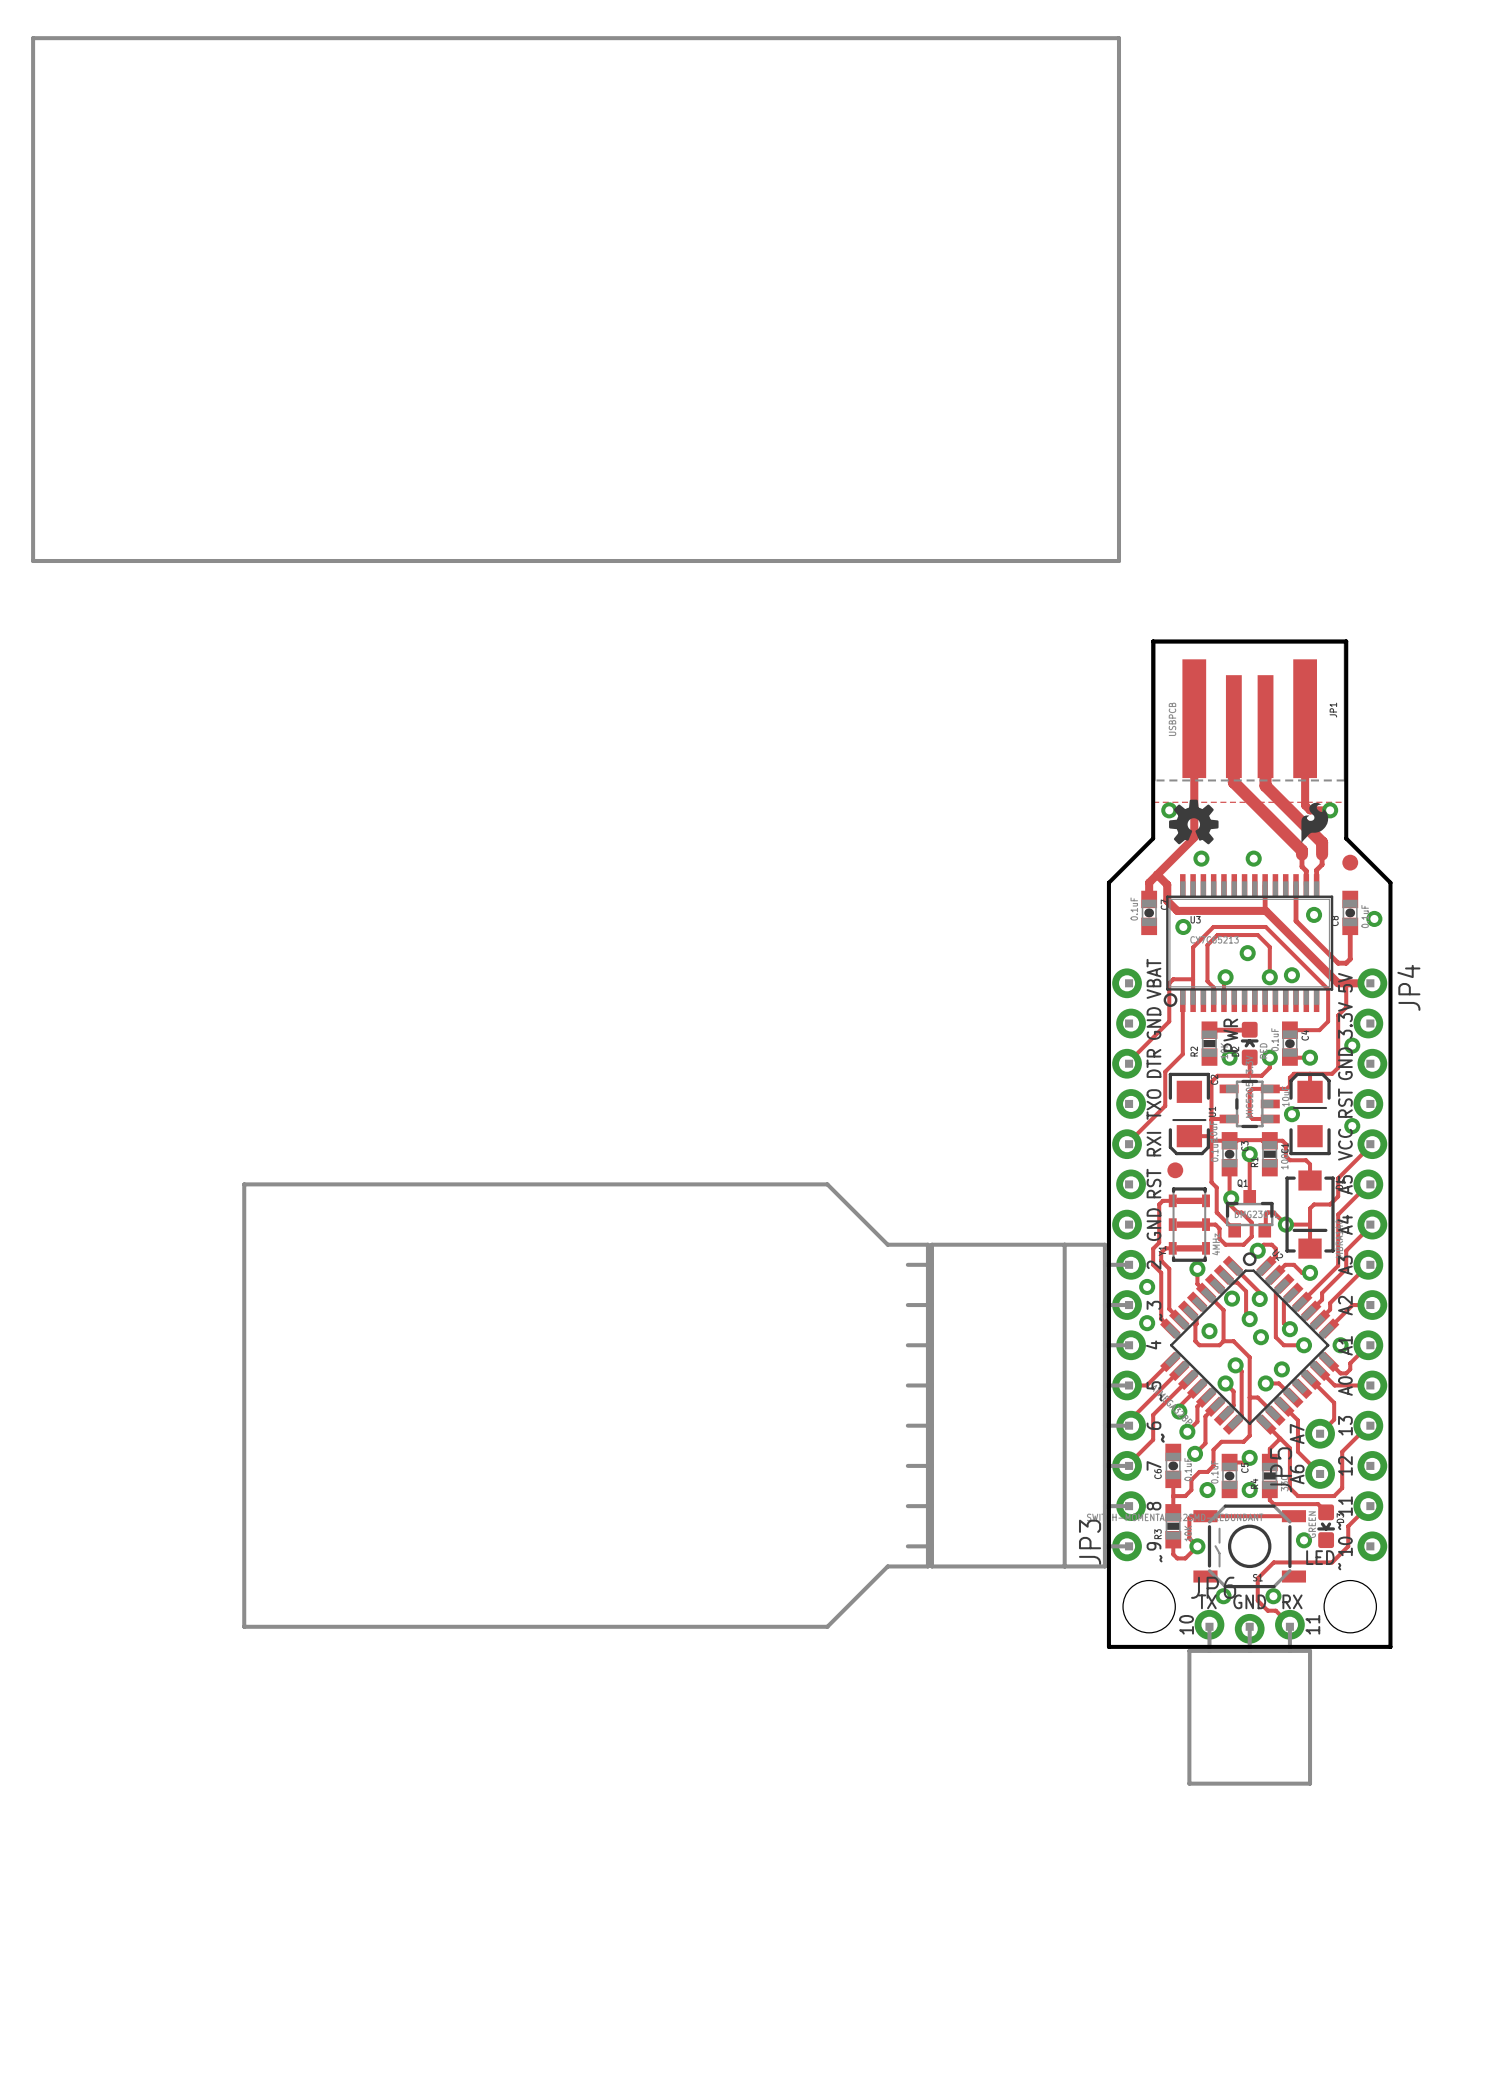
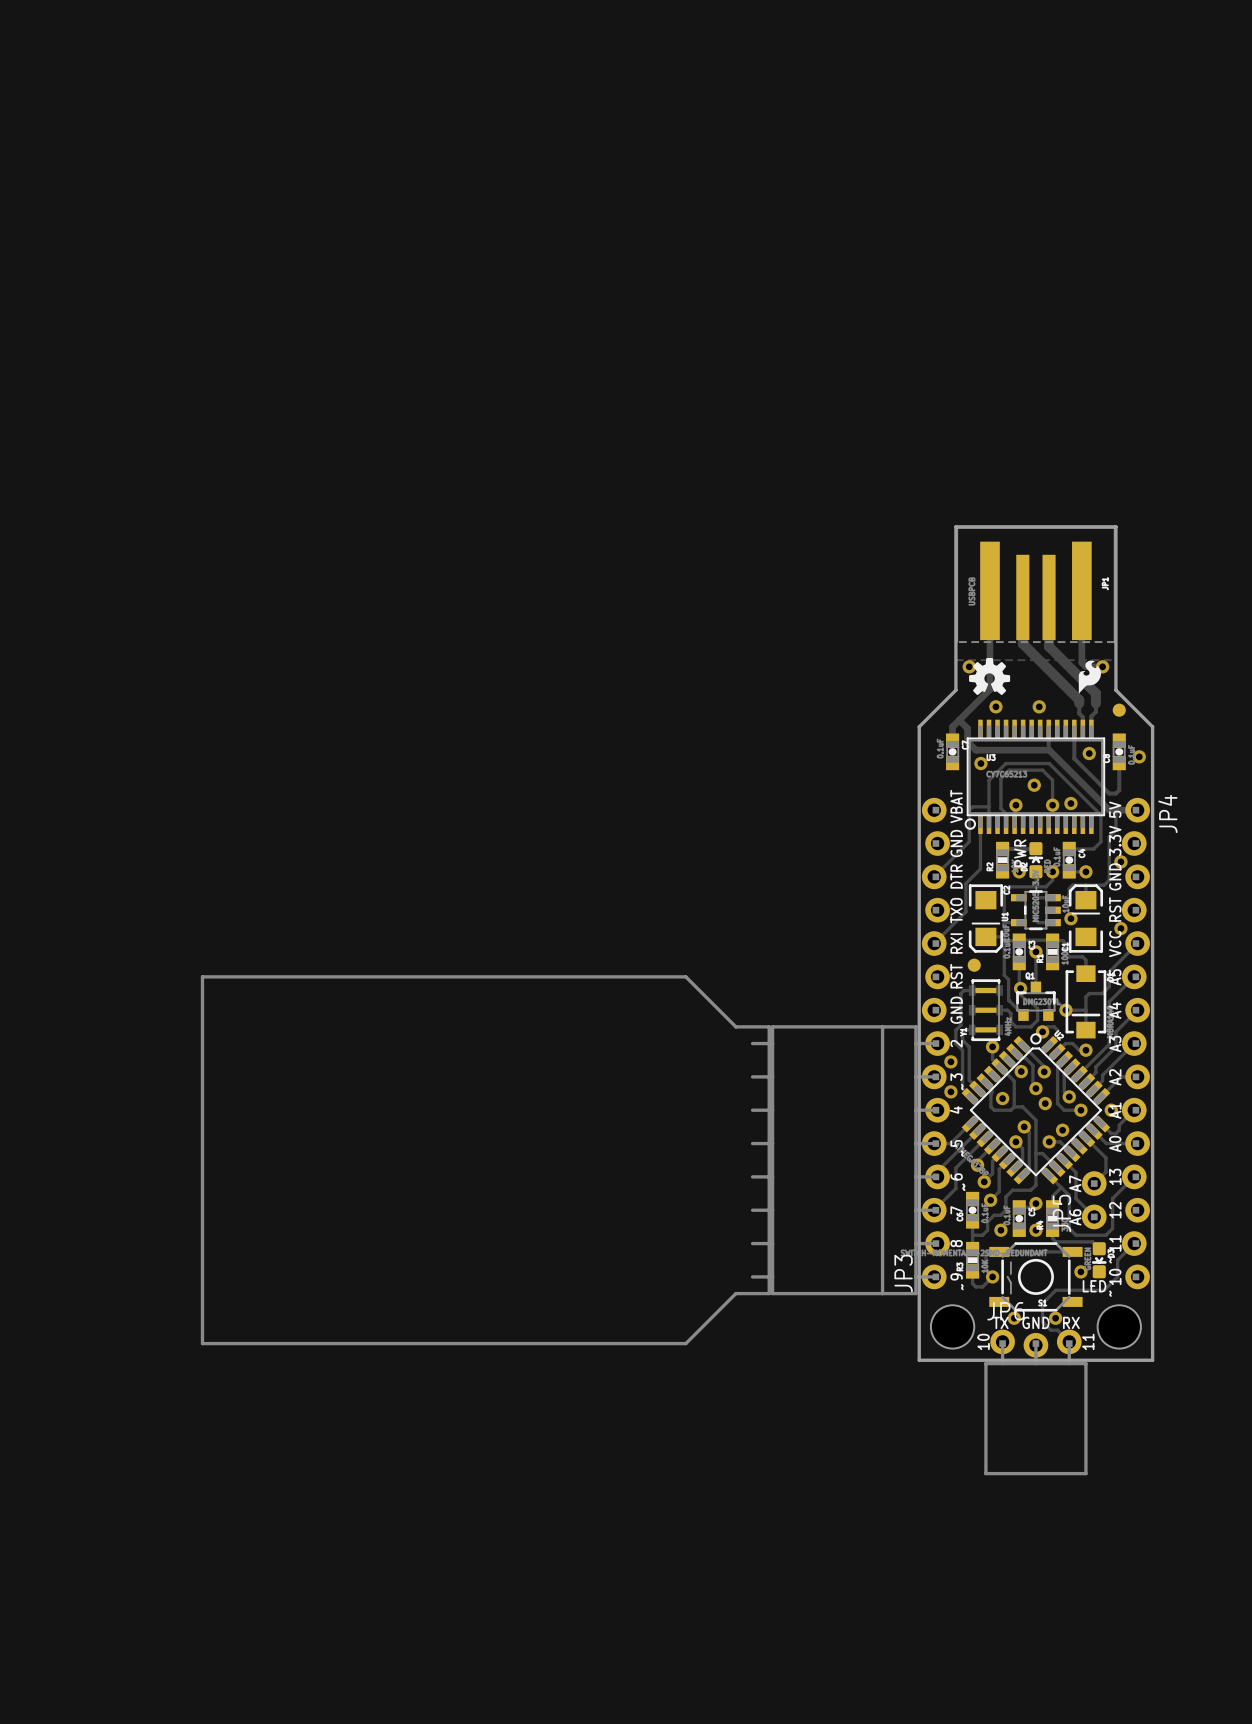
line: (33, 38) (33, 561) (1118, 561) (1118, 38) (33, 38) -> none

